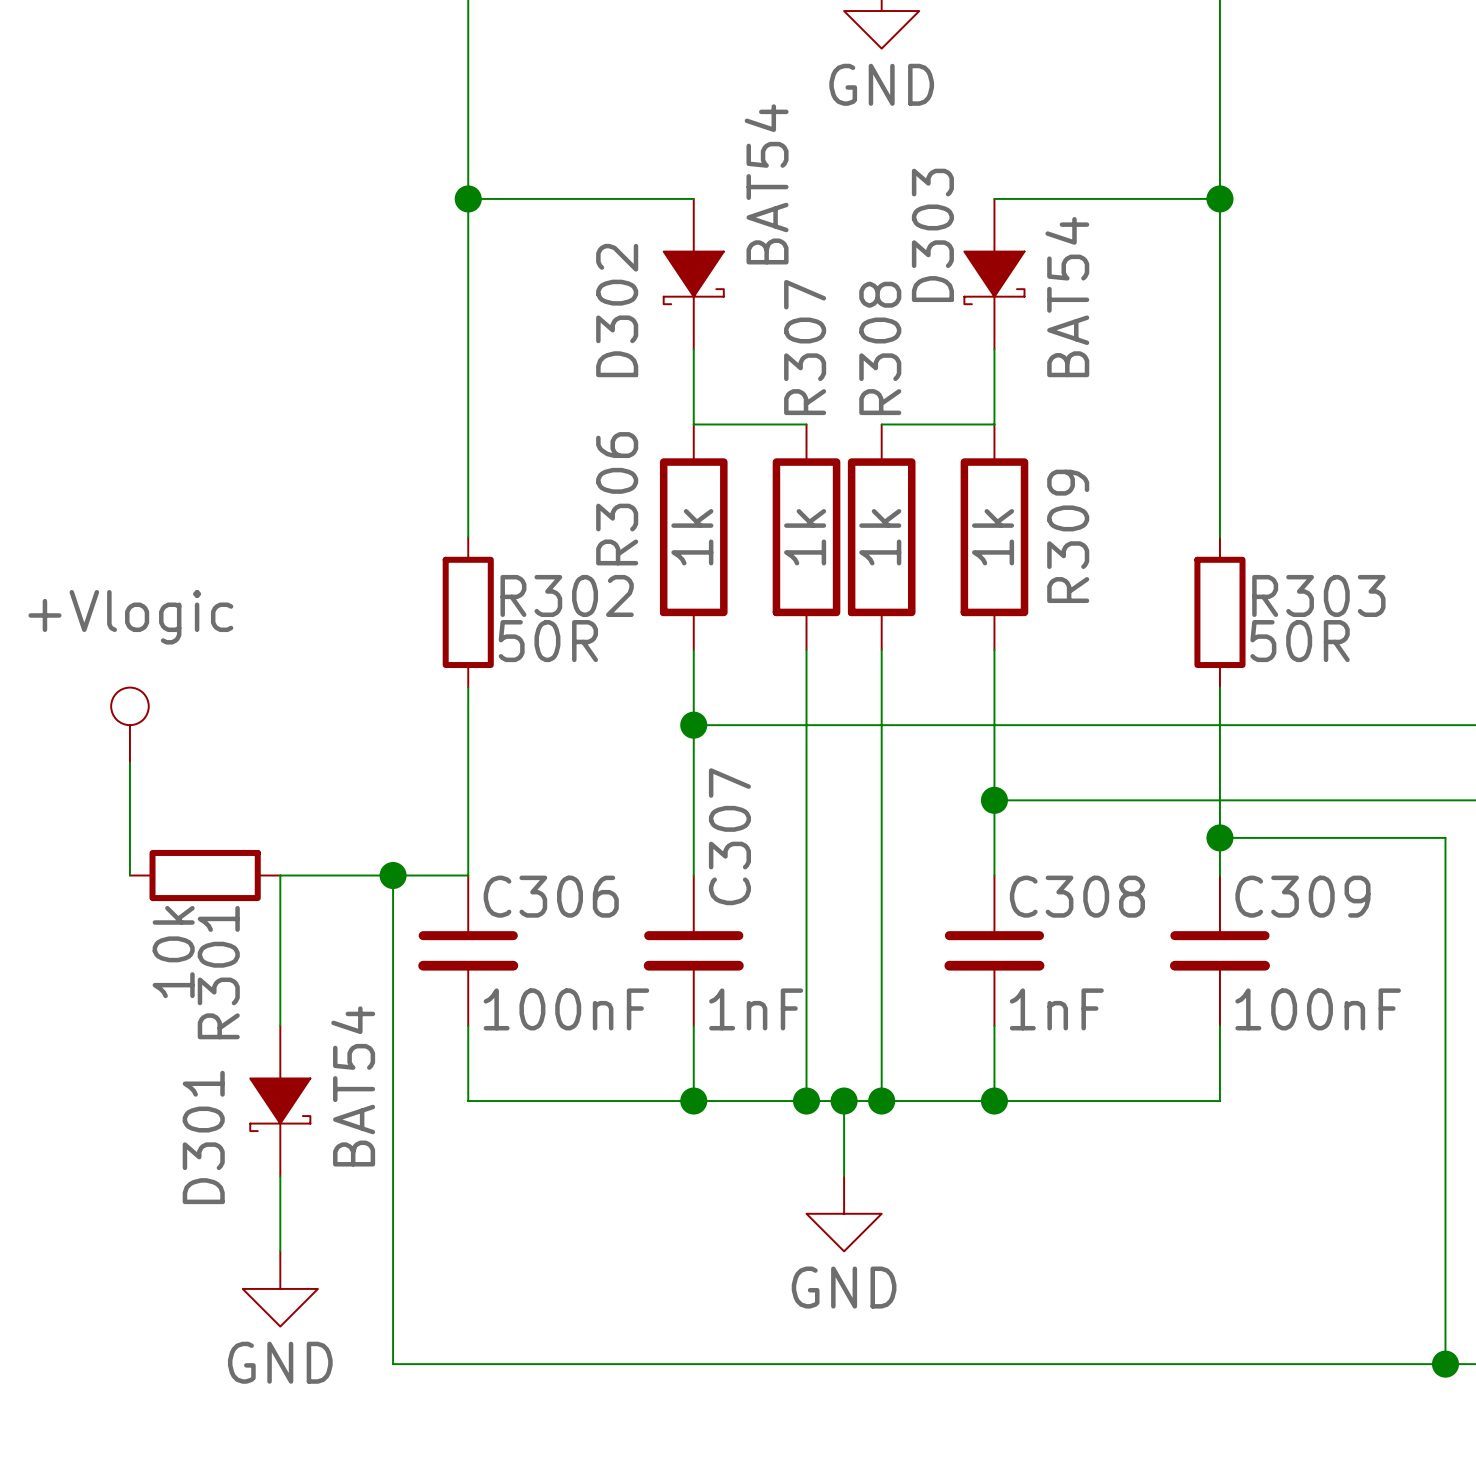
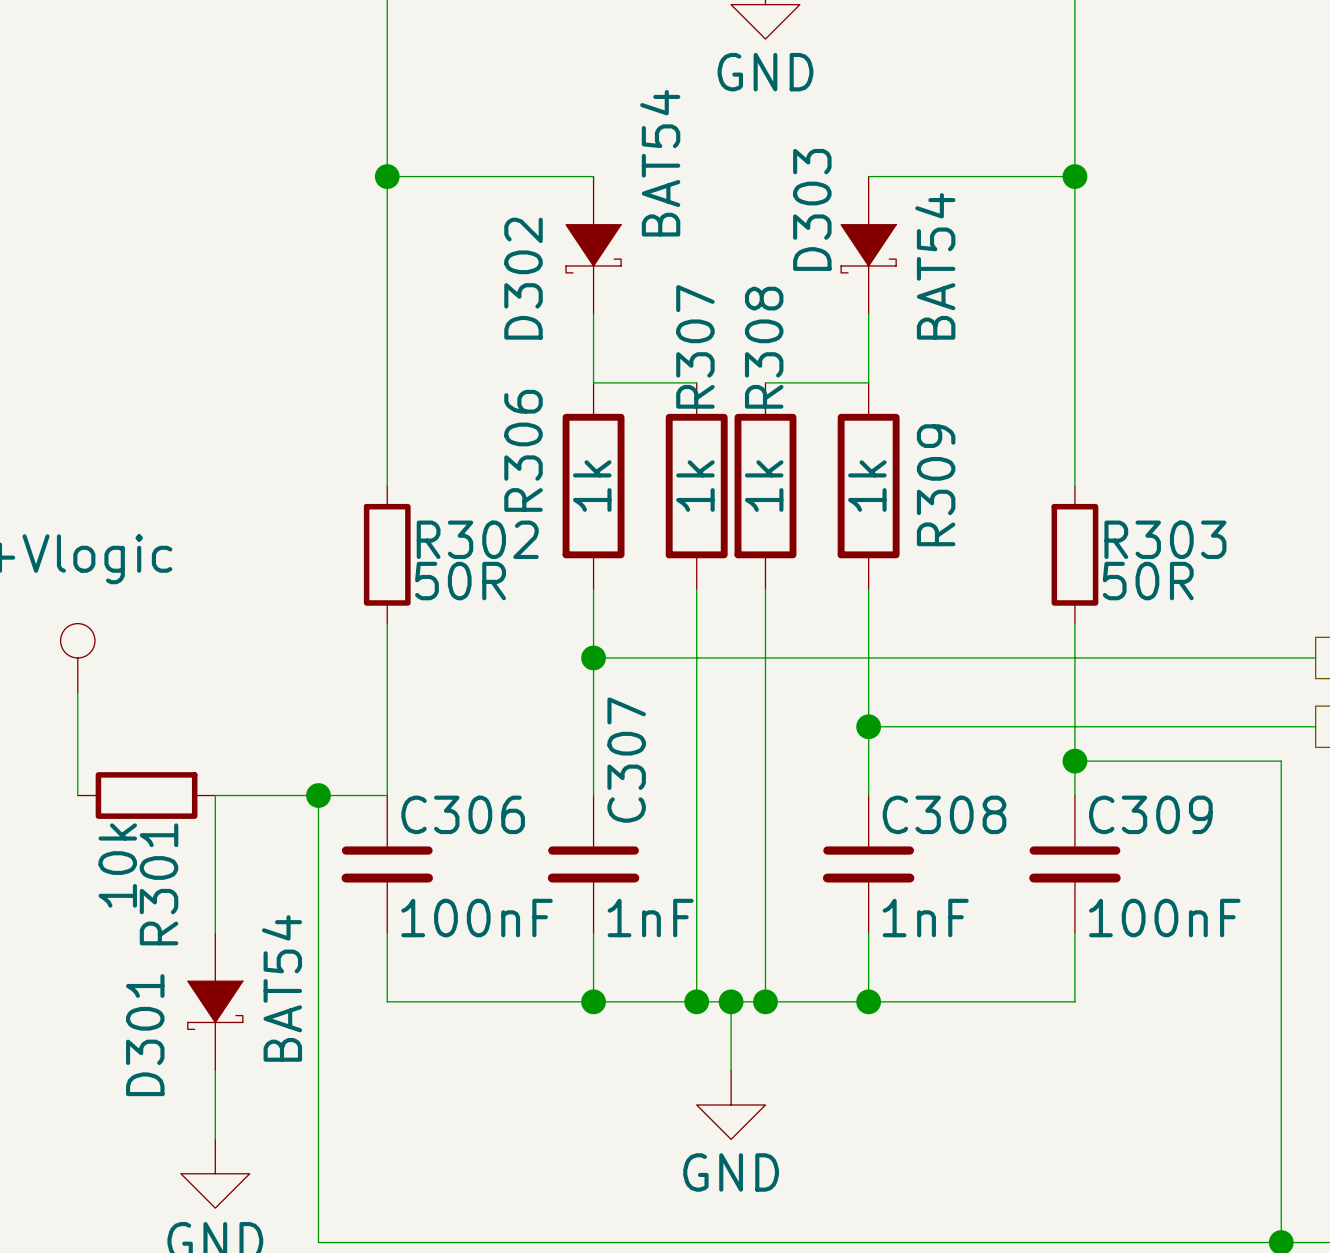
R307 name position: R307 (805, 347) -> R307 (695, 346)
R308 name position: R308 (880, 348) -> R308 (764, 347)

